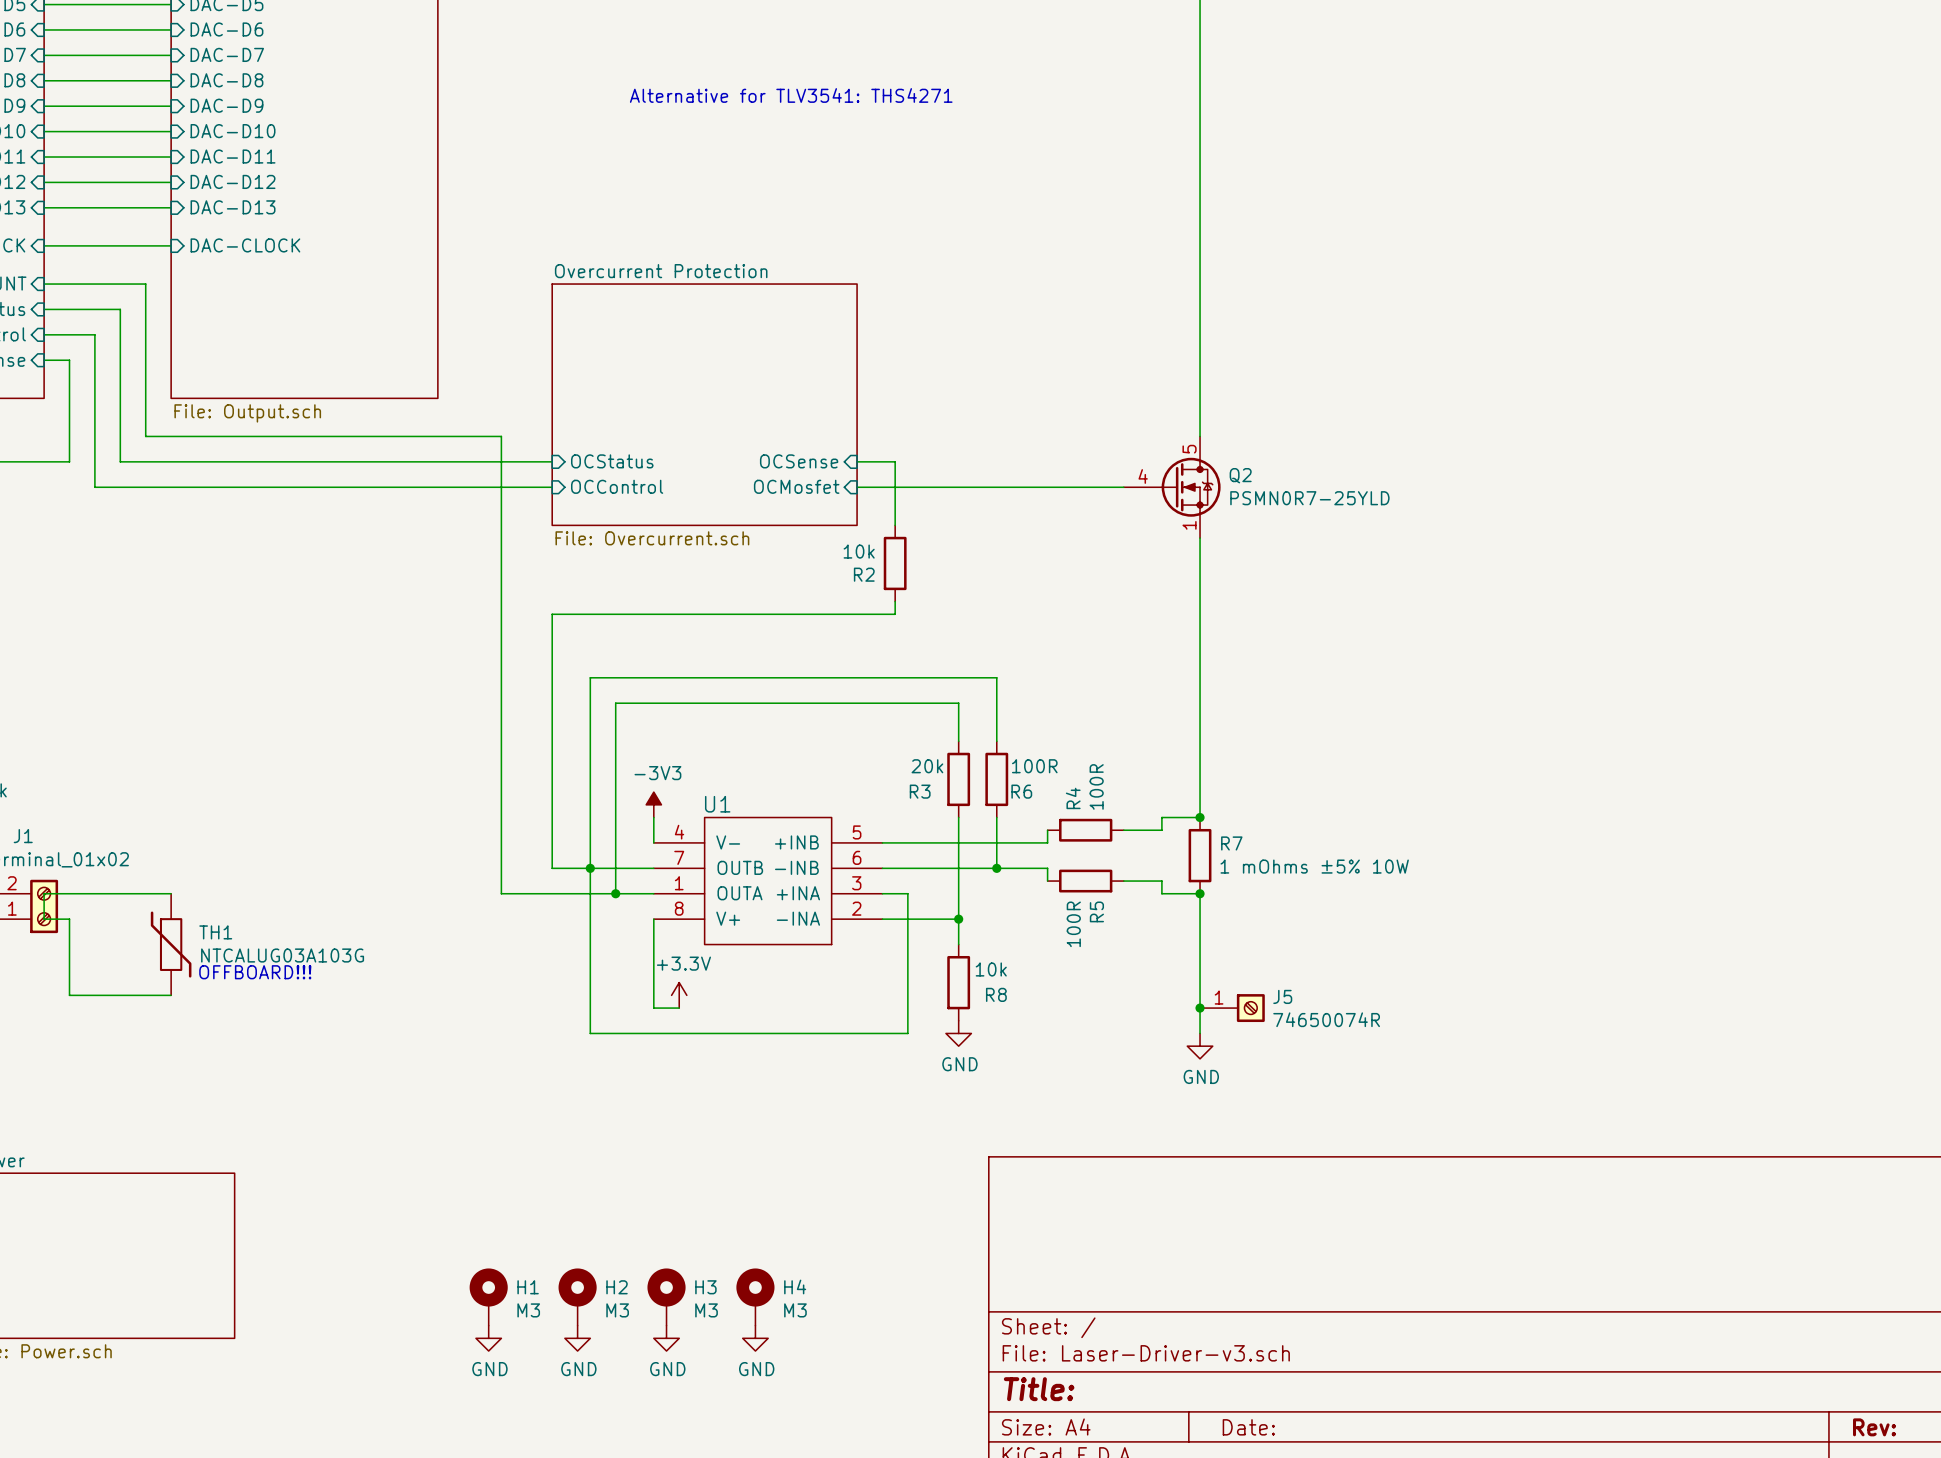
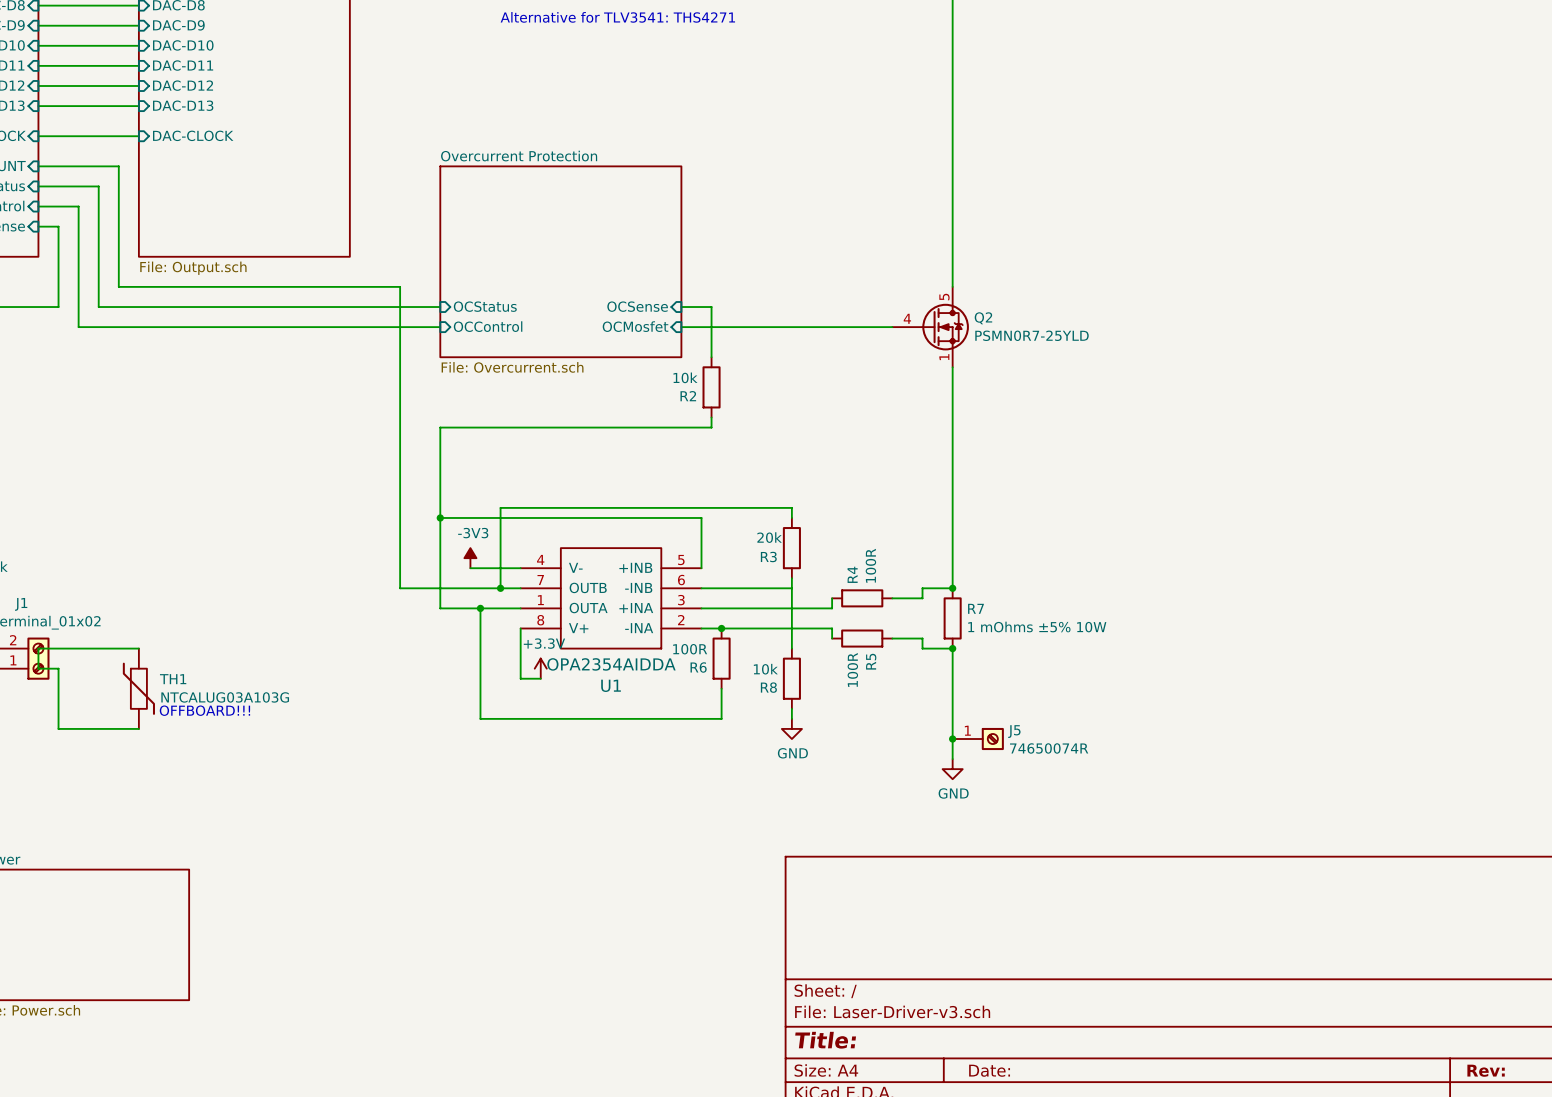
wire: (996, 715) (996, 677) (590, 677) (590, 1033) (907, 1033) (907, 982) -> (791, 507) (500, 507) (500, 588)
wire: none -> (440, 517) (701, 517) (701, 568)
junction: none -> (440, 517)
wire: (958, 741) (958, 703) (615, 703) (615, 893) -> none
R6 value position: 100R (1034, 766) -> 100R (690, 649)
R3 position: (958, 779) -> (791, 548)
R6 position: (996, 779) -> (721, 658)
R3 name position: R3 (920, 791) -> R3 (768, 557)
R6 name position: R6 (1021, 791) -> R6 (698, 667)
wire: none -> (470, 568) (520, 568)
power symbol position: -3V3 (653, 804) -> -3V3 (470, 558)
U1 name position: U1 (717, 804) -> U1 (611, 685)
wire: none -> (791, 578) (791, 588) (701, 588)
wire: (501, 817) (501, 893) (653, 893) -> (400, 588) (520, 588)
junction: none -> (500, 588)
wire: (653, 817) (653, 842) -> none
wire: (958, 817) (958, 944) -> none
wire: (552, 842) (552, 868) (653, 868) -> (440, 608) (520, 608)
wire: none -> (480, 608) (480, 718) (721, 718)
junction: none -> (480, 608)
junction: (590, 868) -> none
wire: none -> (520, 628) (520, 668)
junction: none -> (721, 628)
wire: none -> (791, 628) (791, 648)
junction: (996, 868) -> none
U1 position: (768, 881) -> (611, 598)
junction: (615, 893) -> none
wire: (882, 893) (907, 893) (907, 944) -> none
U1 value: none -> OPA2354AIDDA (611, 664)
wire: (882, 919) (958, 919) -> none
junction: (958, 919) -> none
wire: (653, 931) (653, 1008) (679, 1008) -> (520, 678) (540, 678)
R8 value position: 10k (991, 969) -> 10k (765, 669)
R8 position: (958, 982) -> (791, 678)
R8 name position: R8 (996, 994) -> R8 (768, 687)
power symbol position: +3.3V (679, 995) -> +3.3V (540, 668)
power symbol position: GND (958, 1033) -> GND (791, 728)
H1: M3 (488, 1297) -> none
H2: M3 (577, 1297) -> none
H3: M3 (666, 1297) -> none
H4: M3 (755, 1297) -> none
power symbol: GND (488, 1338) -> none
power symbol: GND (577, 1338) -> none
power symbol: GND (666, 1338) -> none
power symbol: GND (755, 1338) -> none

